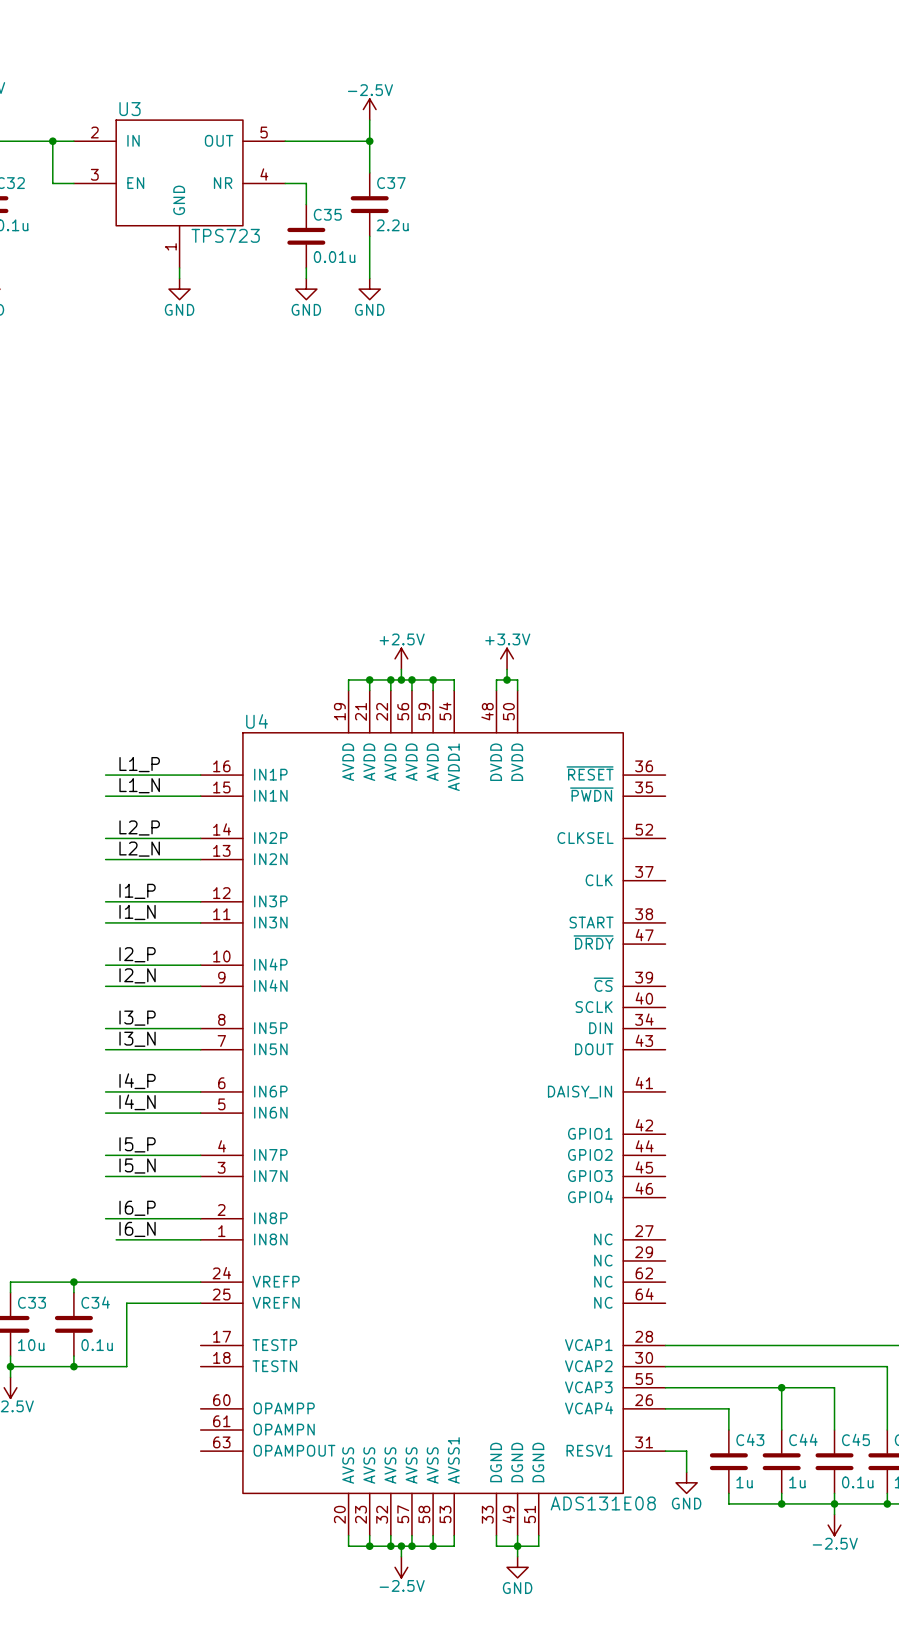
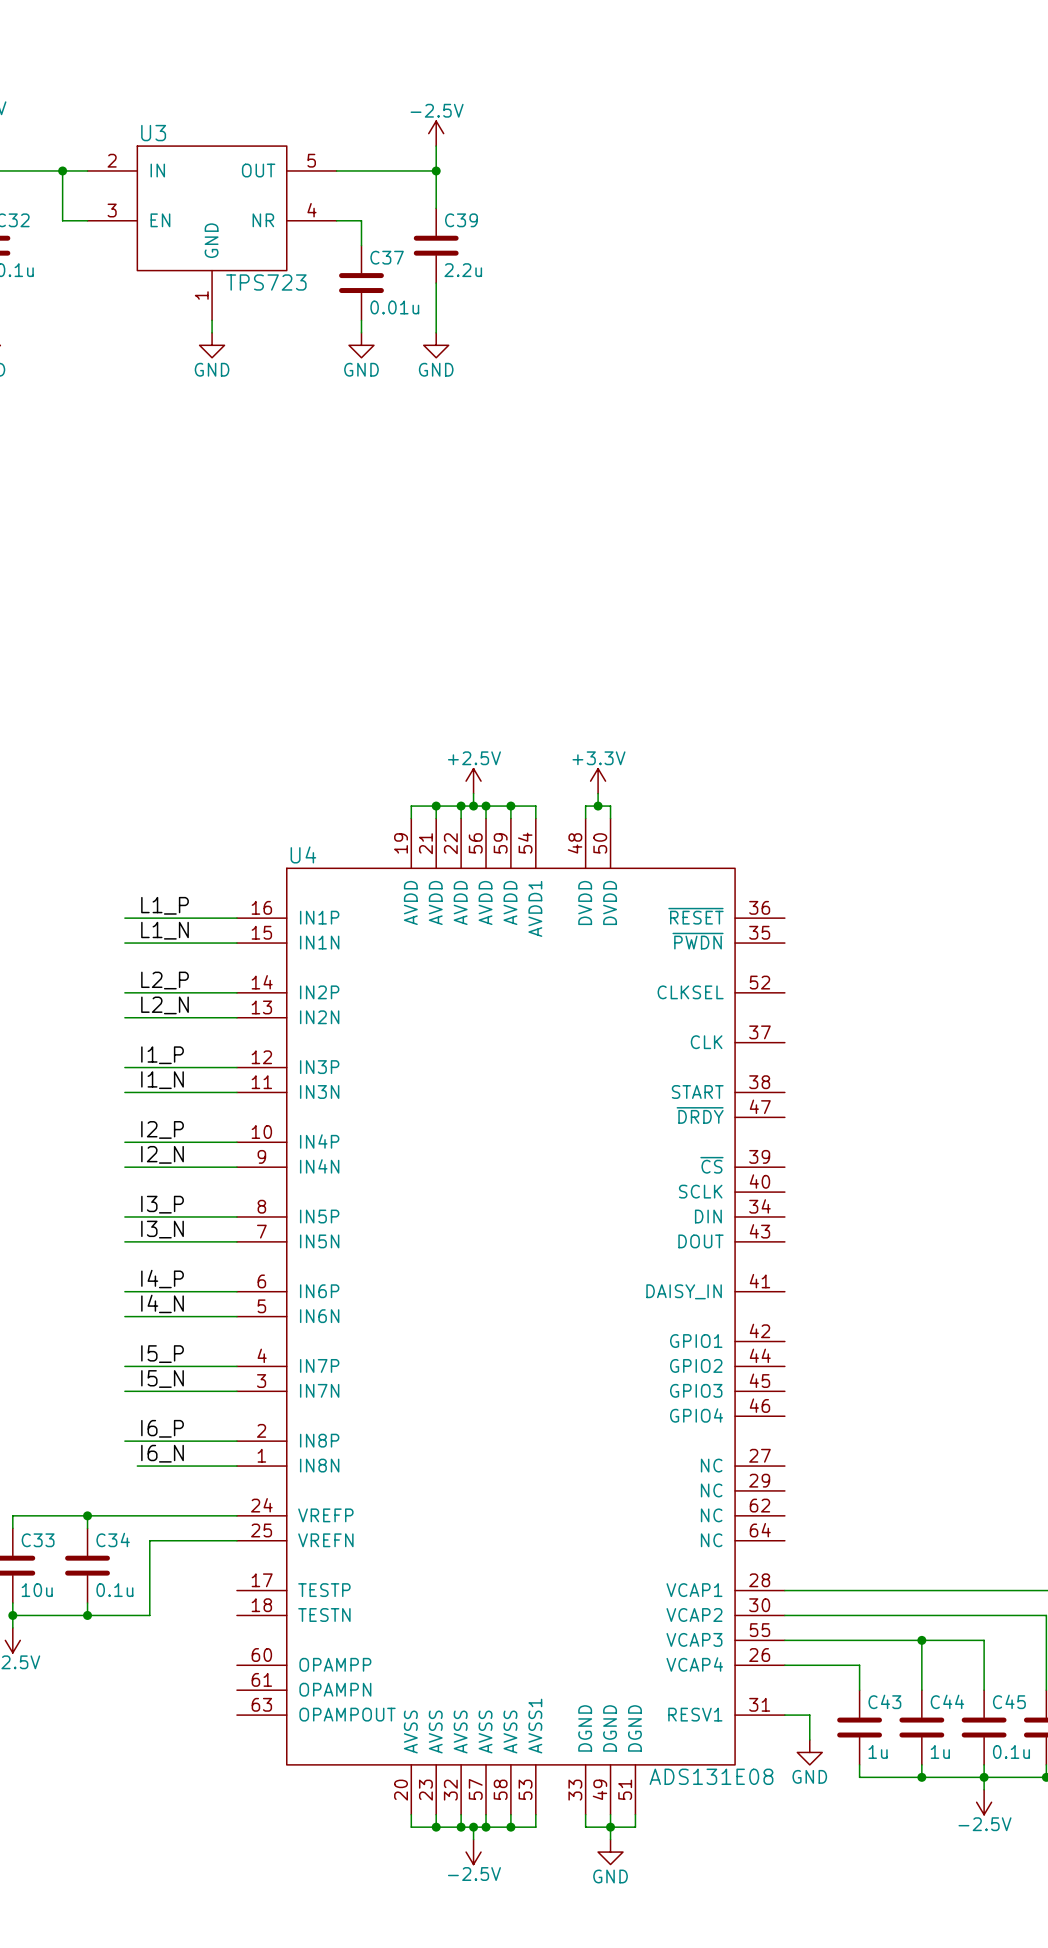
C37 name: C37 (391, 183) -> C39 (461, 220)
C35 name: C35 (327, 214) -> C37 (387, 257)

